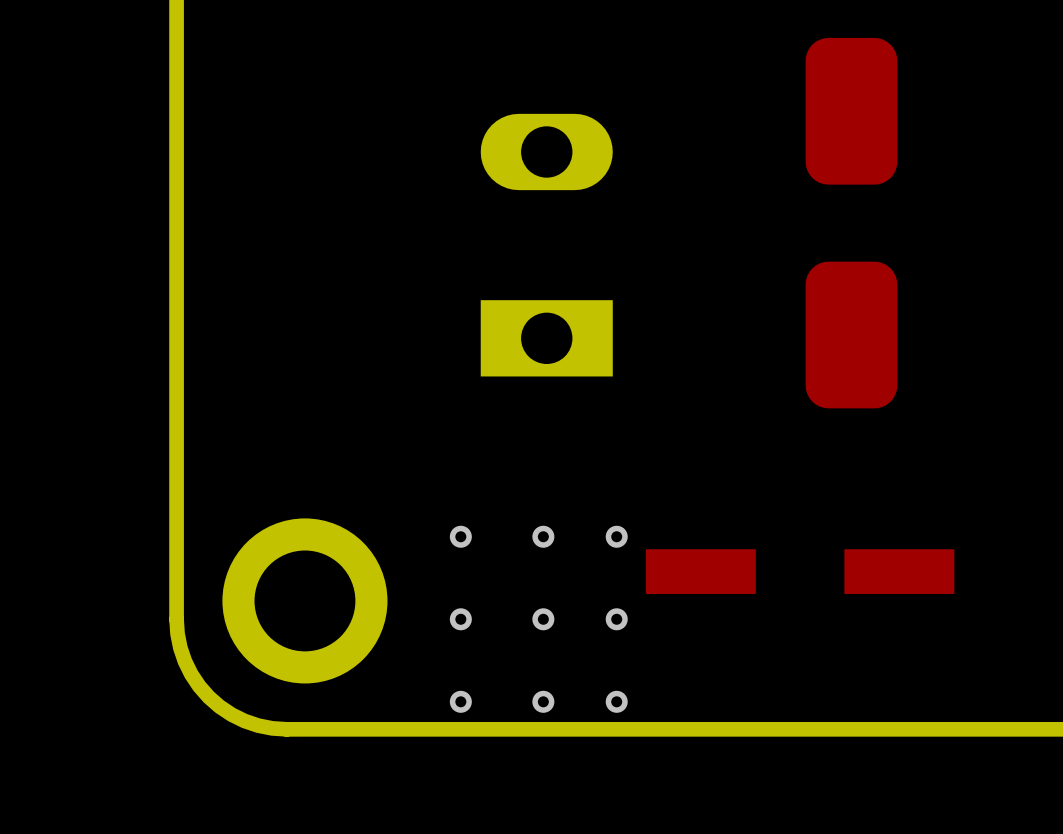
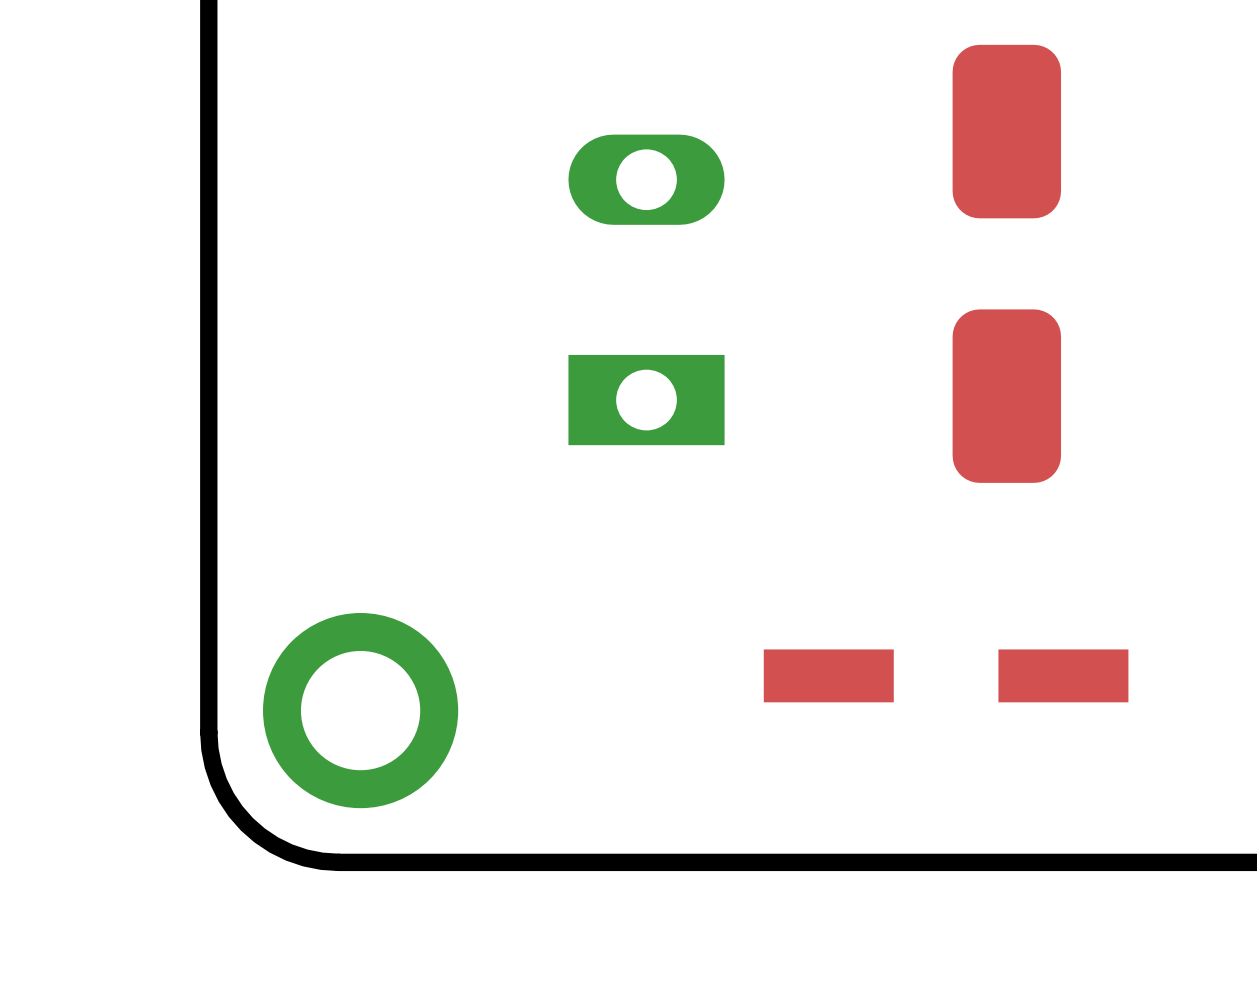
via: (460, 536) -> none
via: (543, 536) -> none
via: (616, 536) -> none
via: (460, 619) -> none
via: (543, 619) -> none
via: (616, 619) -> none
via: (460, 701) -> none
via: (543, 701) -> none
via: (616, 701) -> none

